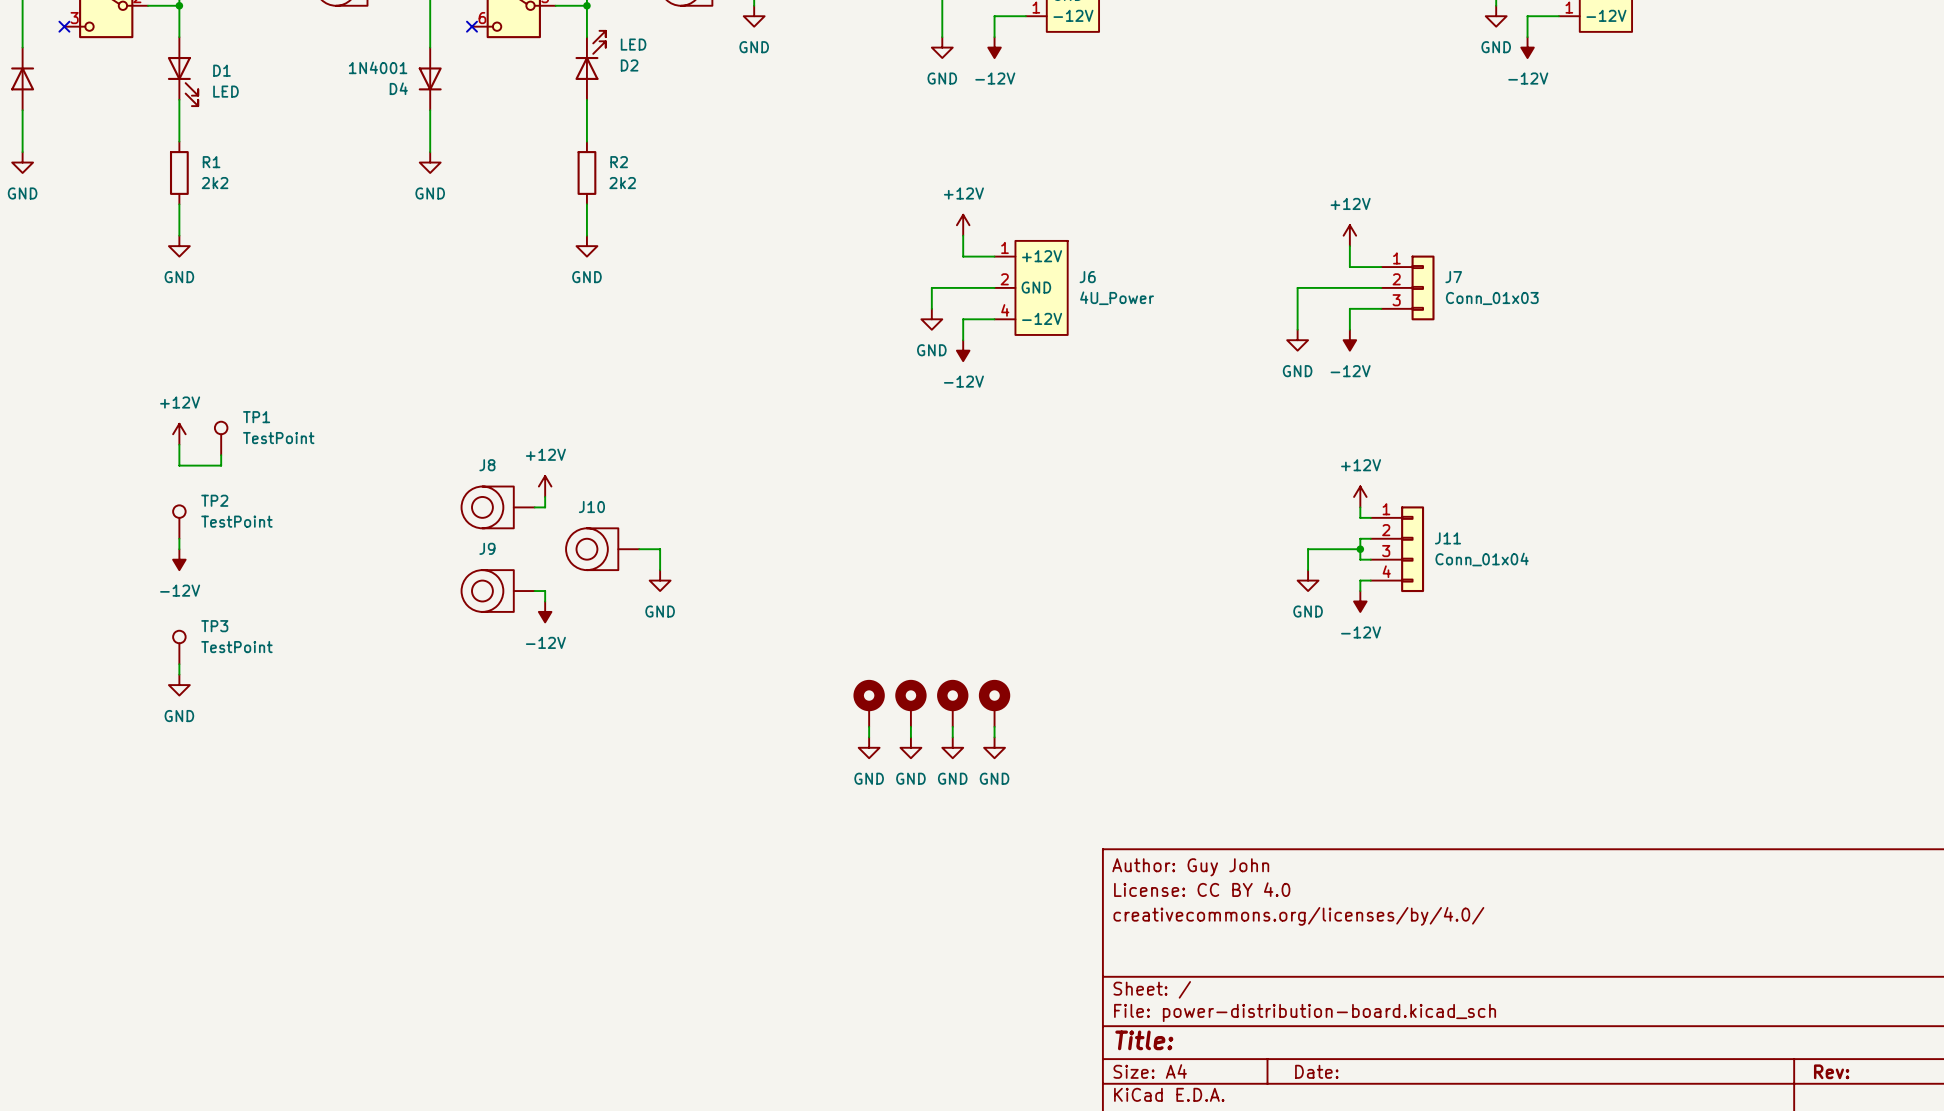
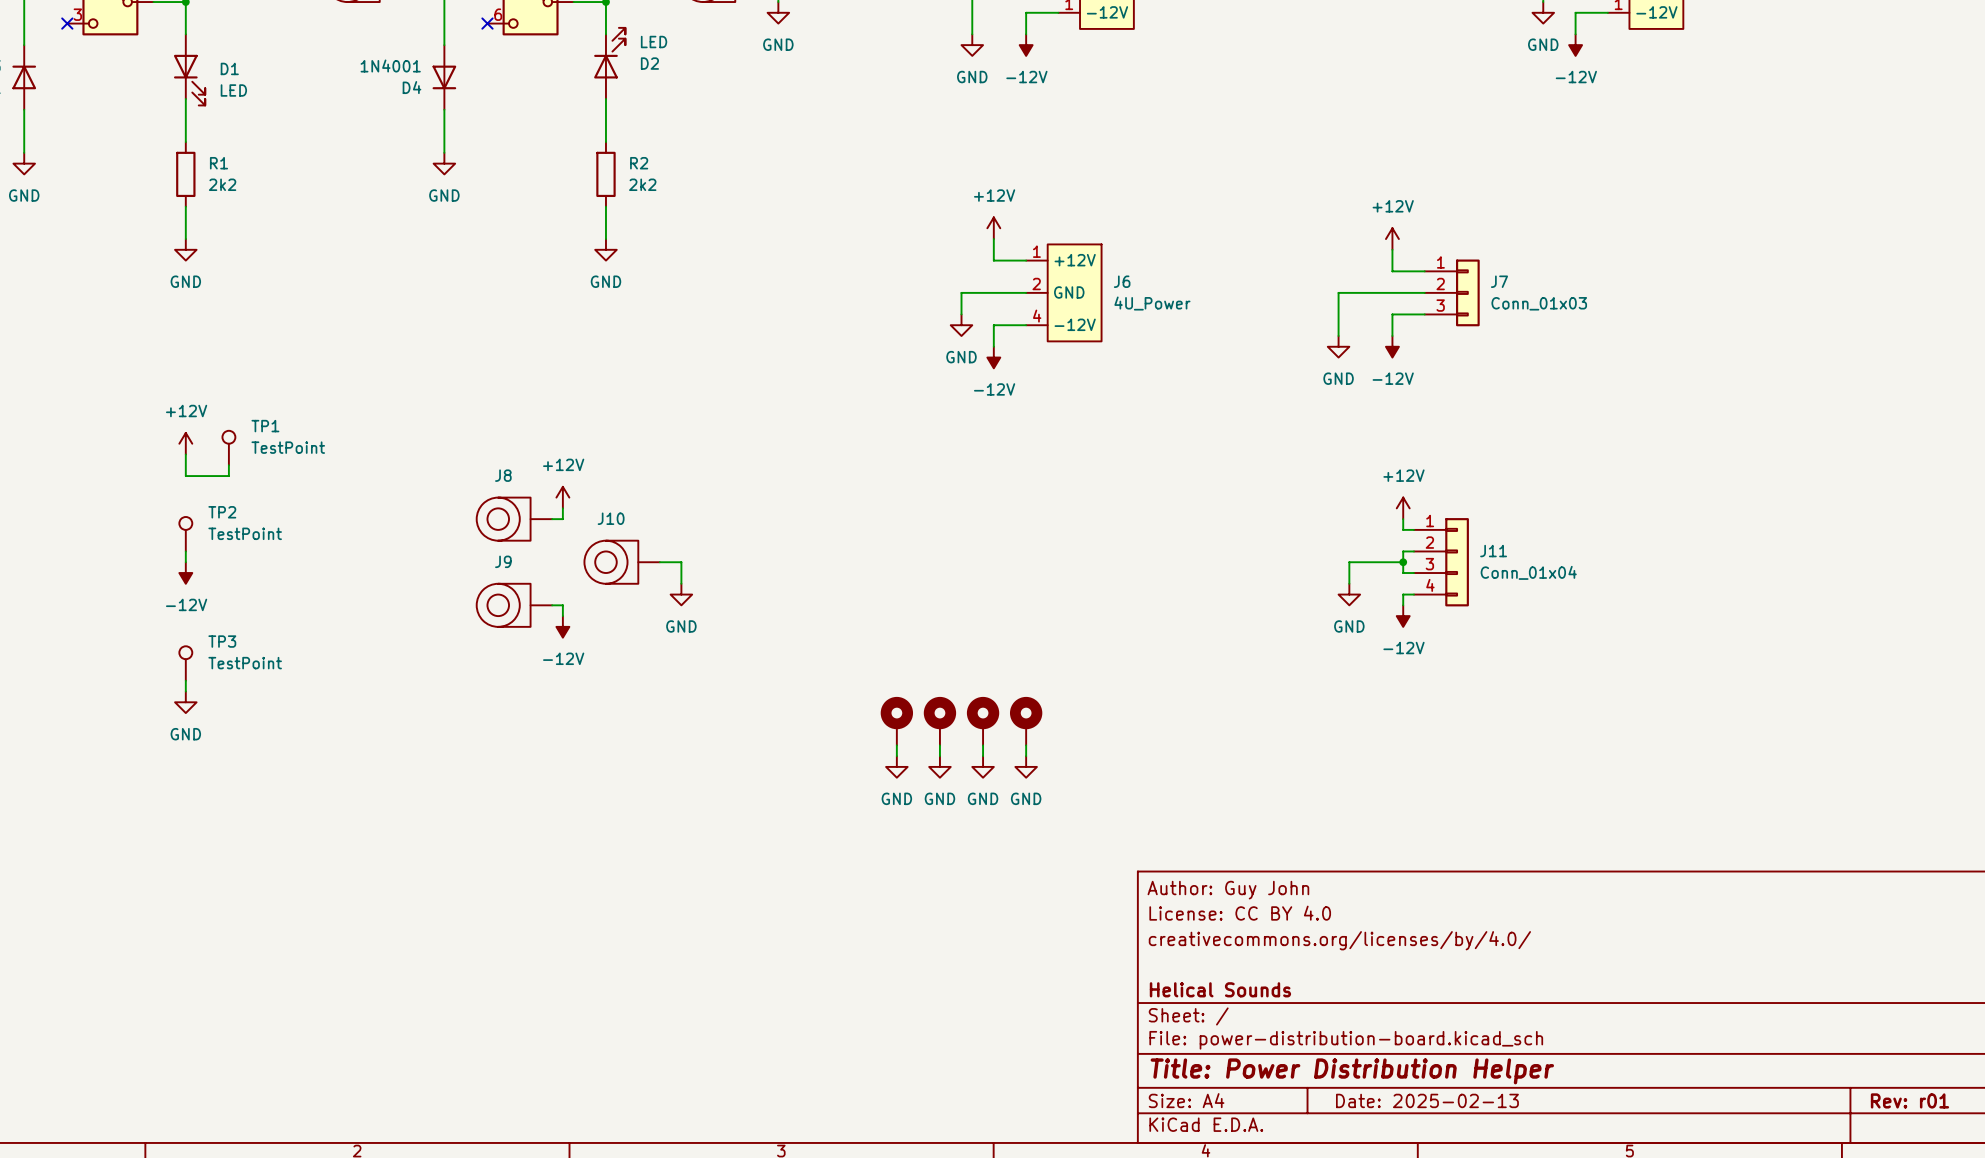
title block: none -> Helical Sounds (1220, 989)
title block: Title: (1144, 1040) -> Title: Power Distribution Helper (1352, 1071)
title block: Date: (1316, 1071) -> Date: 2025-02-13 (1427, 1100)
title block: Rev: (1831, 1071) -> Rev: r01 (1909, 1100)

